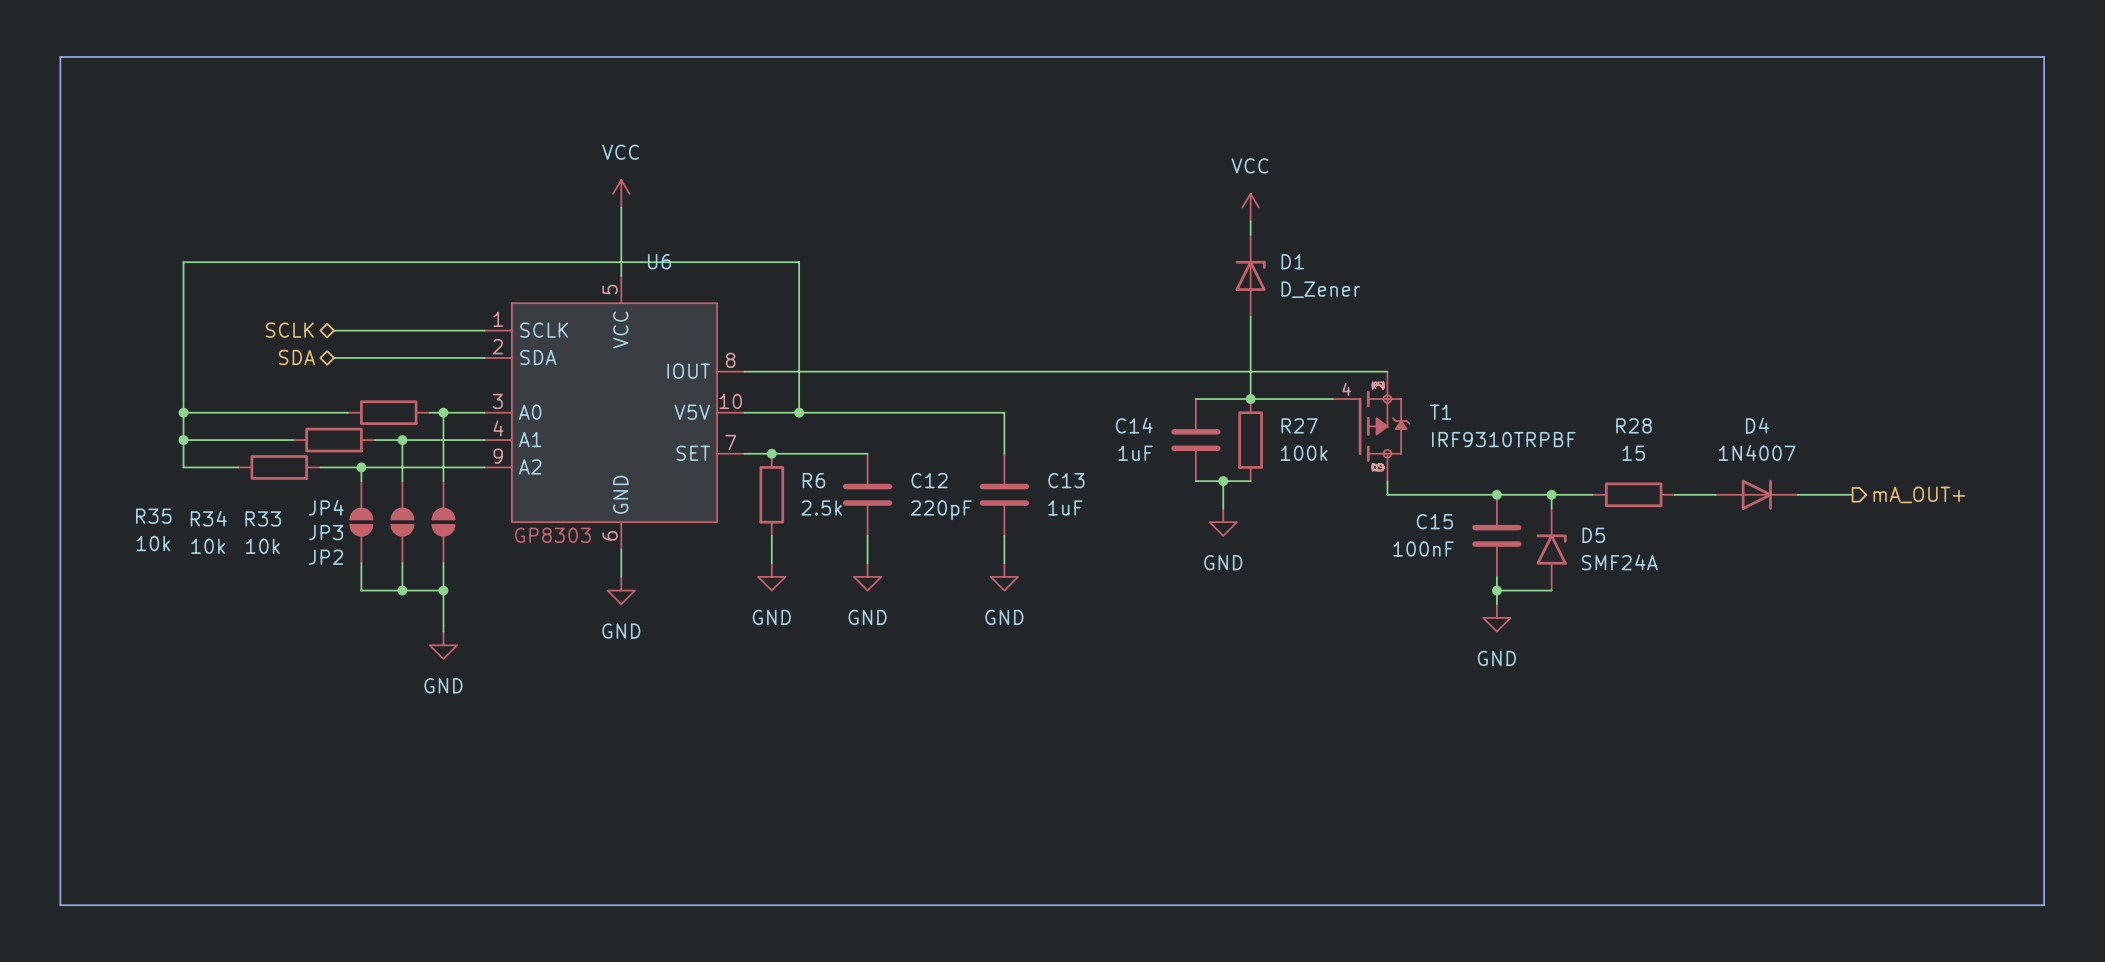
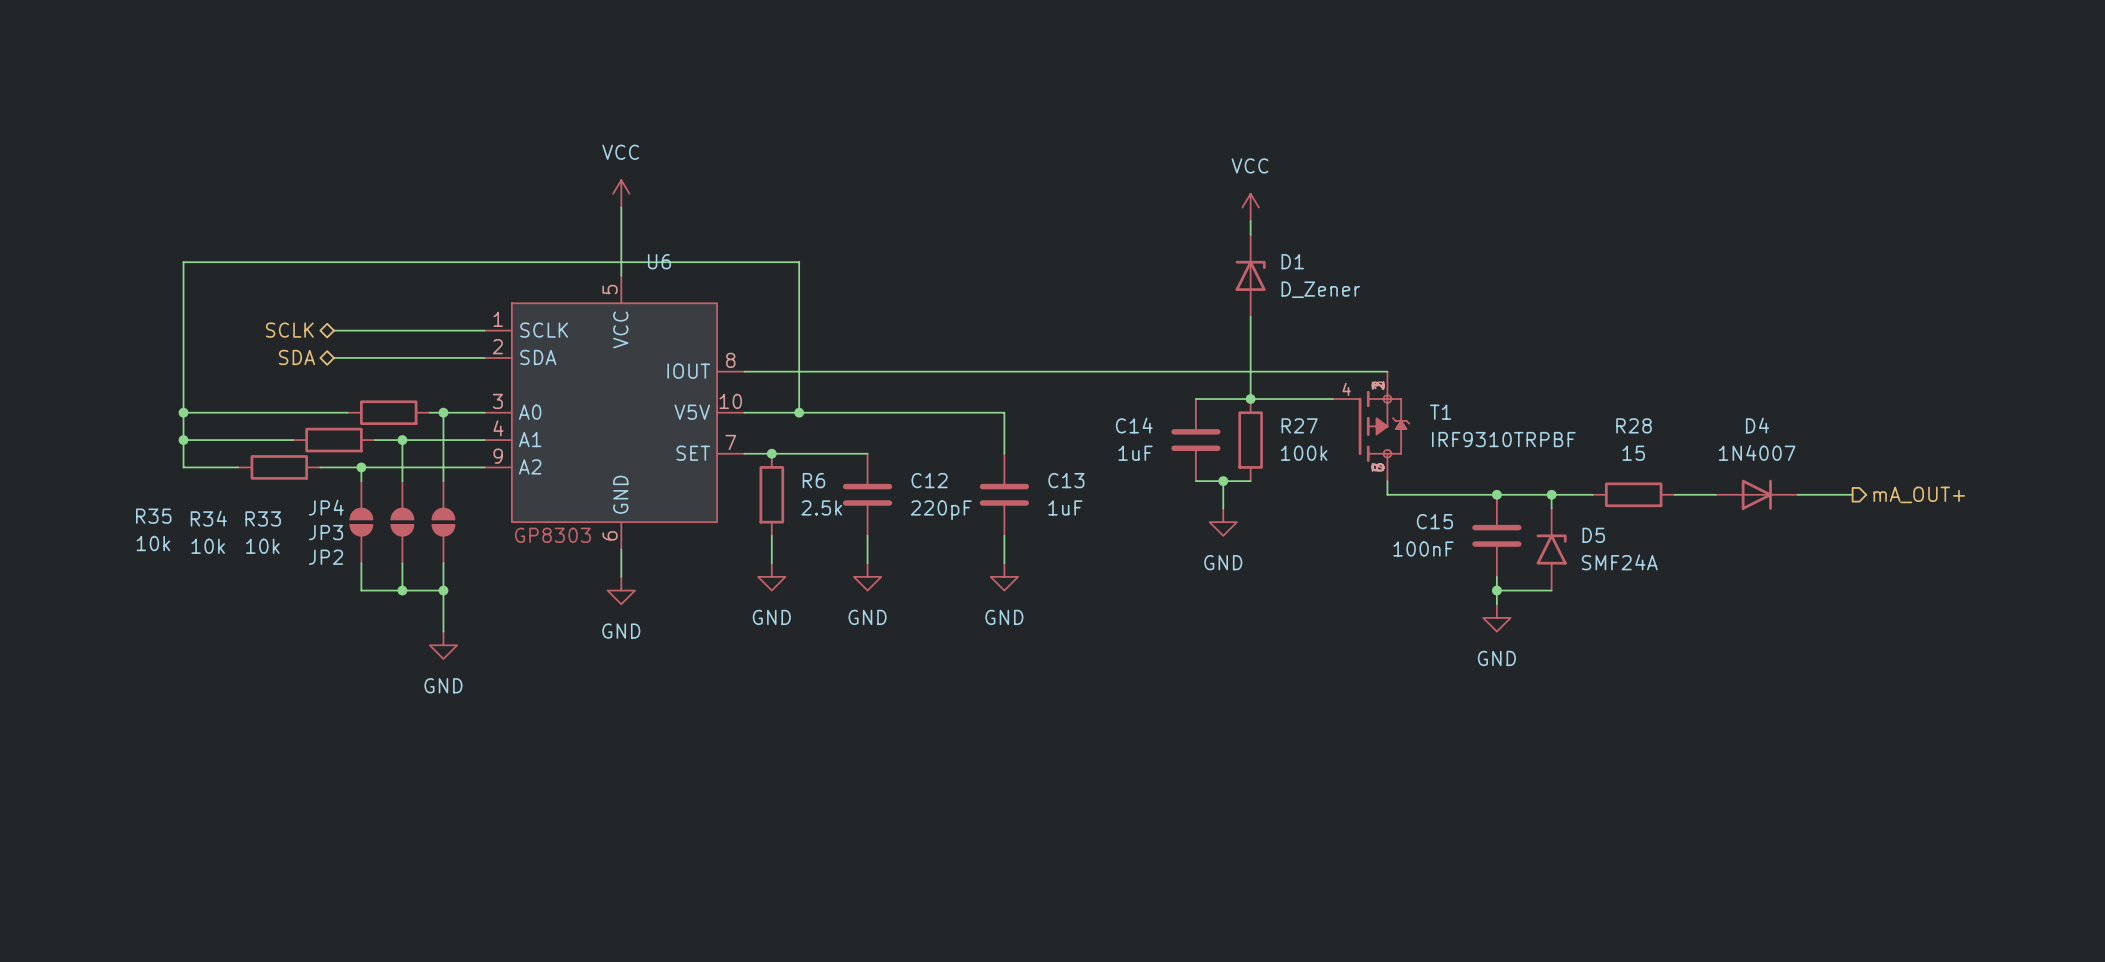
line: (60, 57) (2044, 57) (2044, 905) (60, 905) (60, 57) -> none

